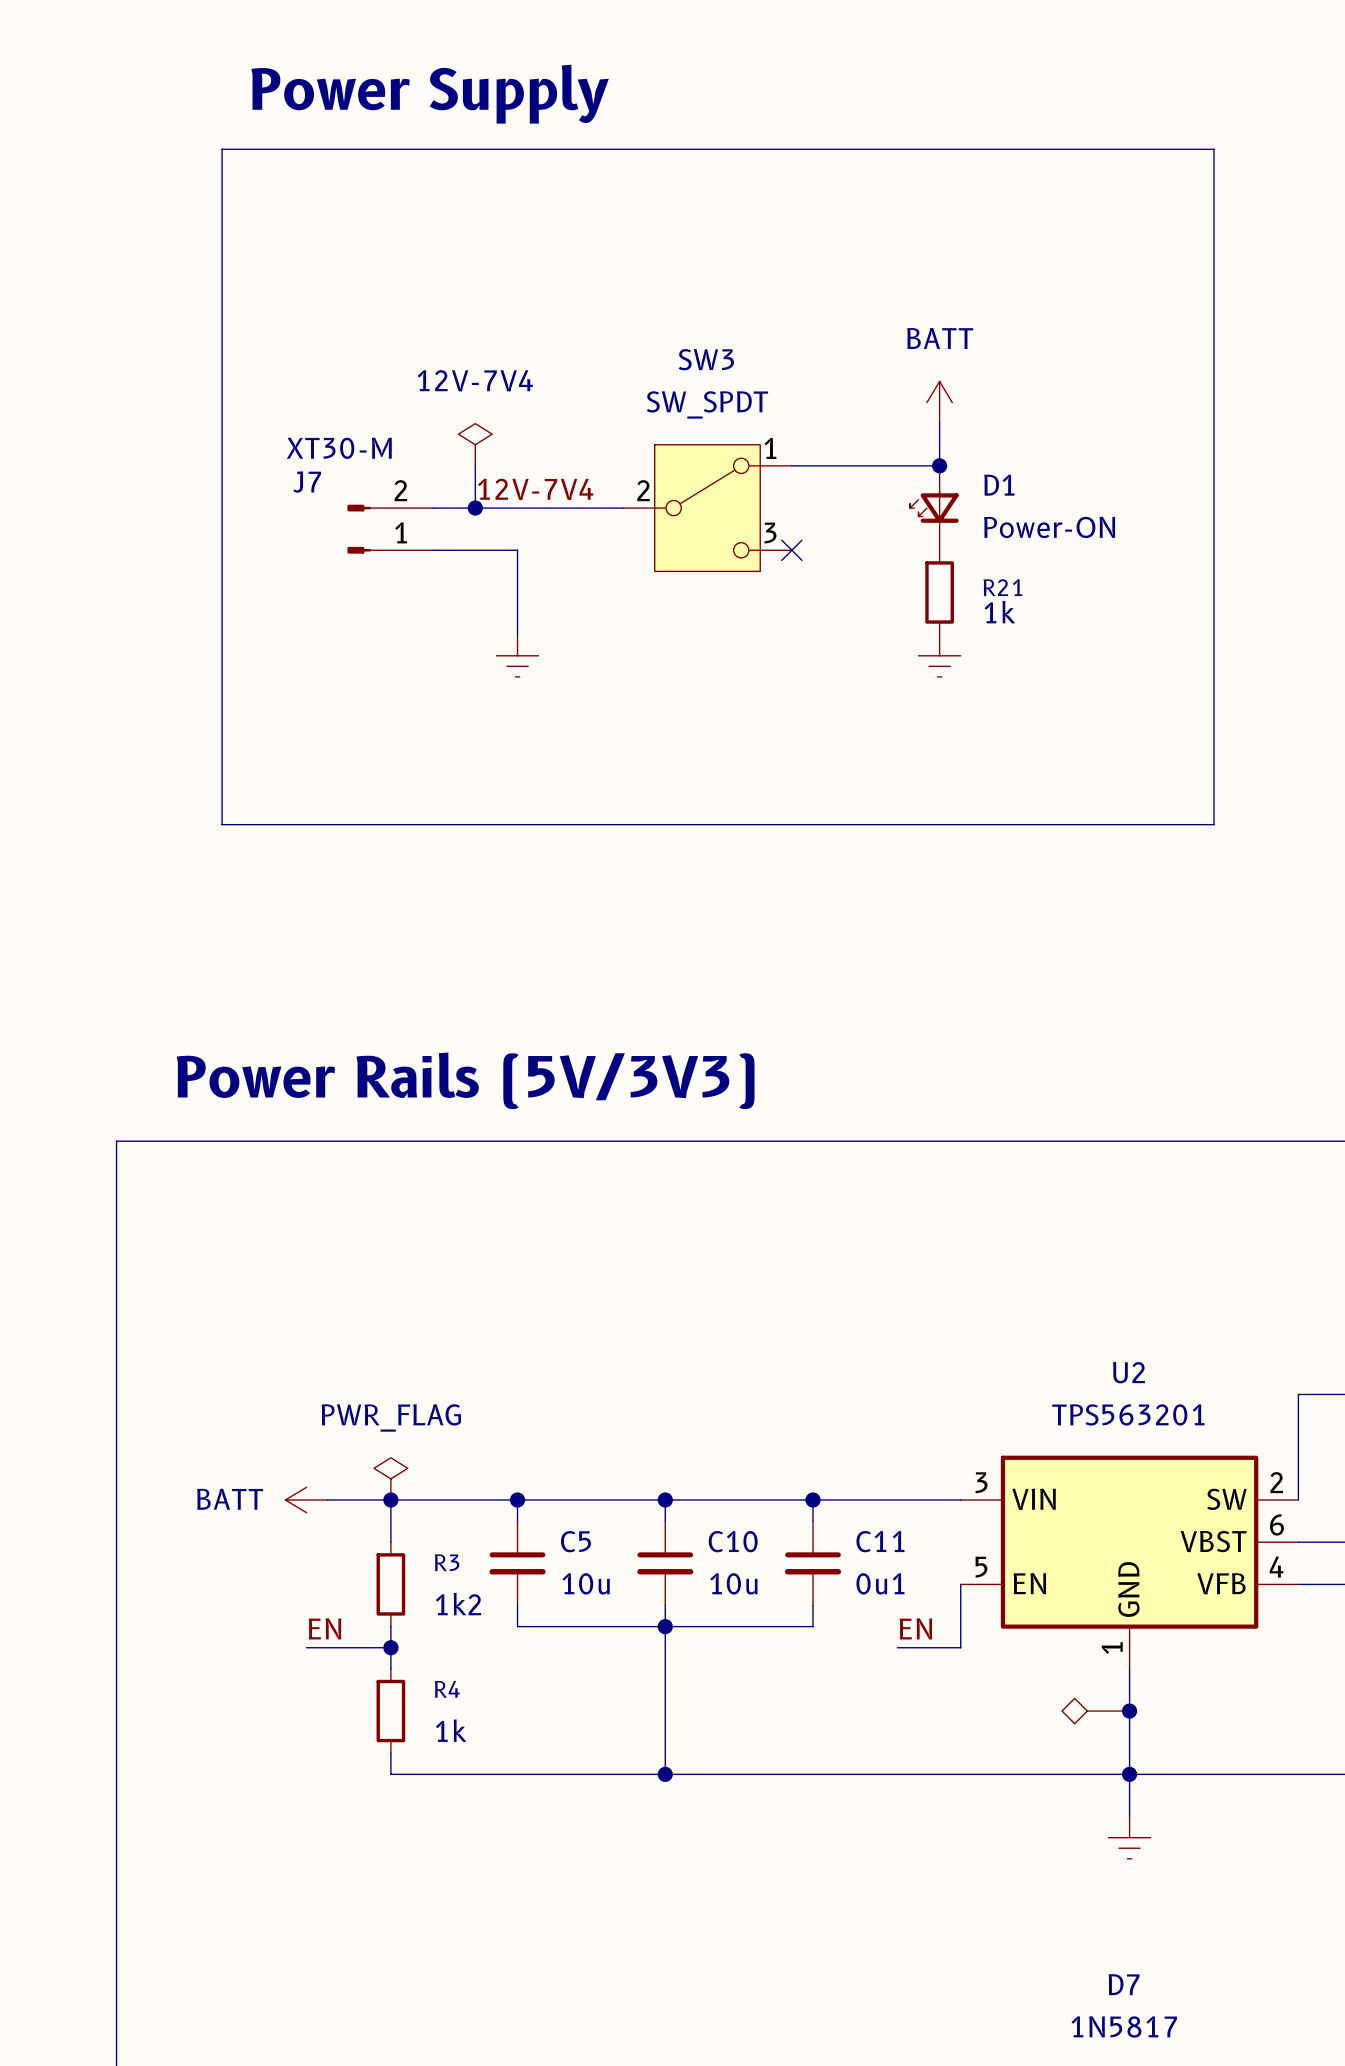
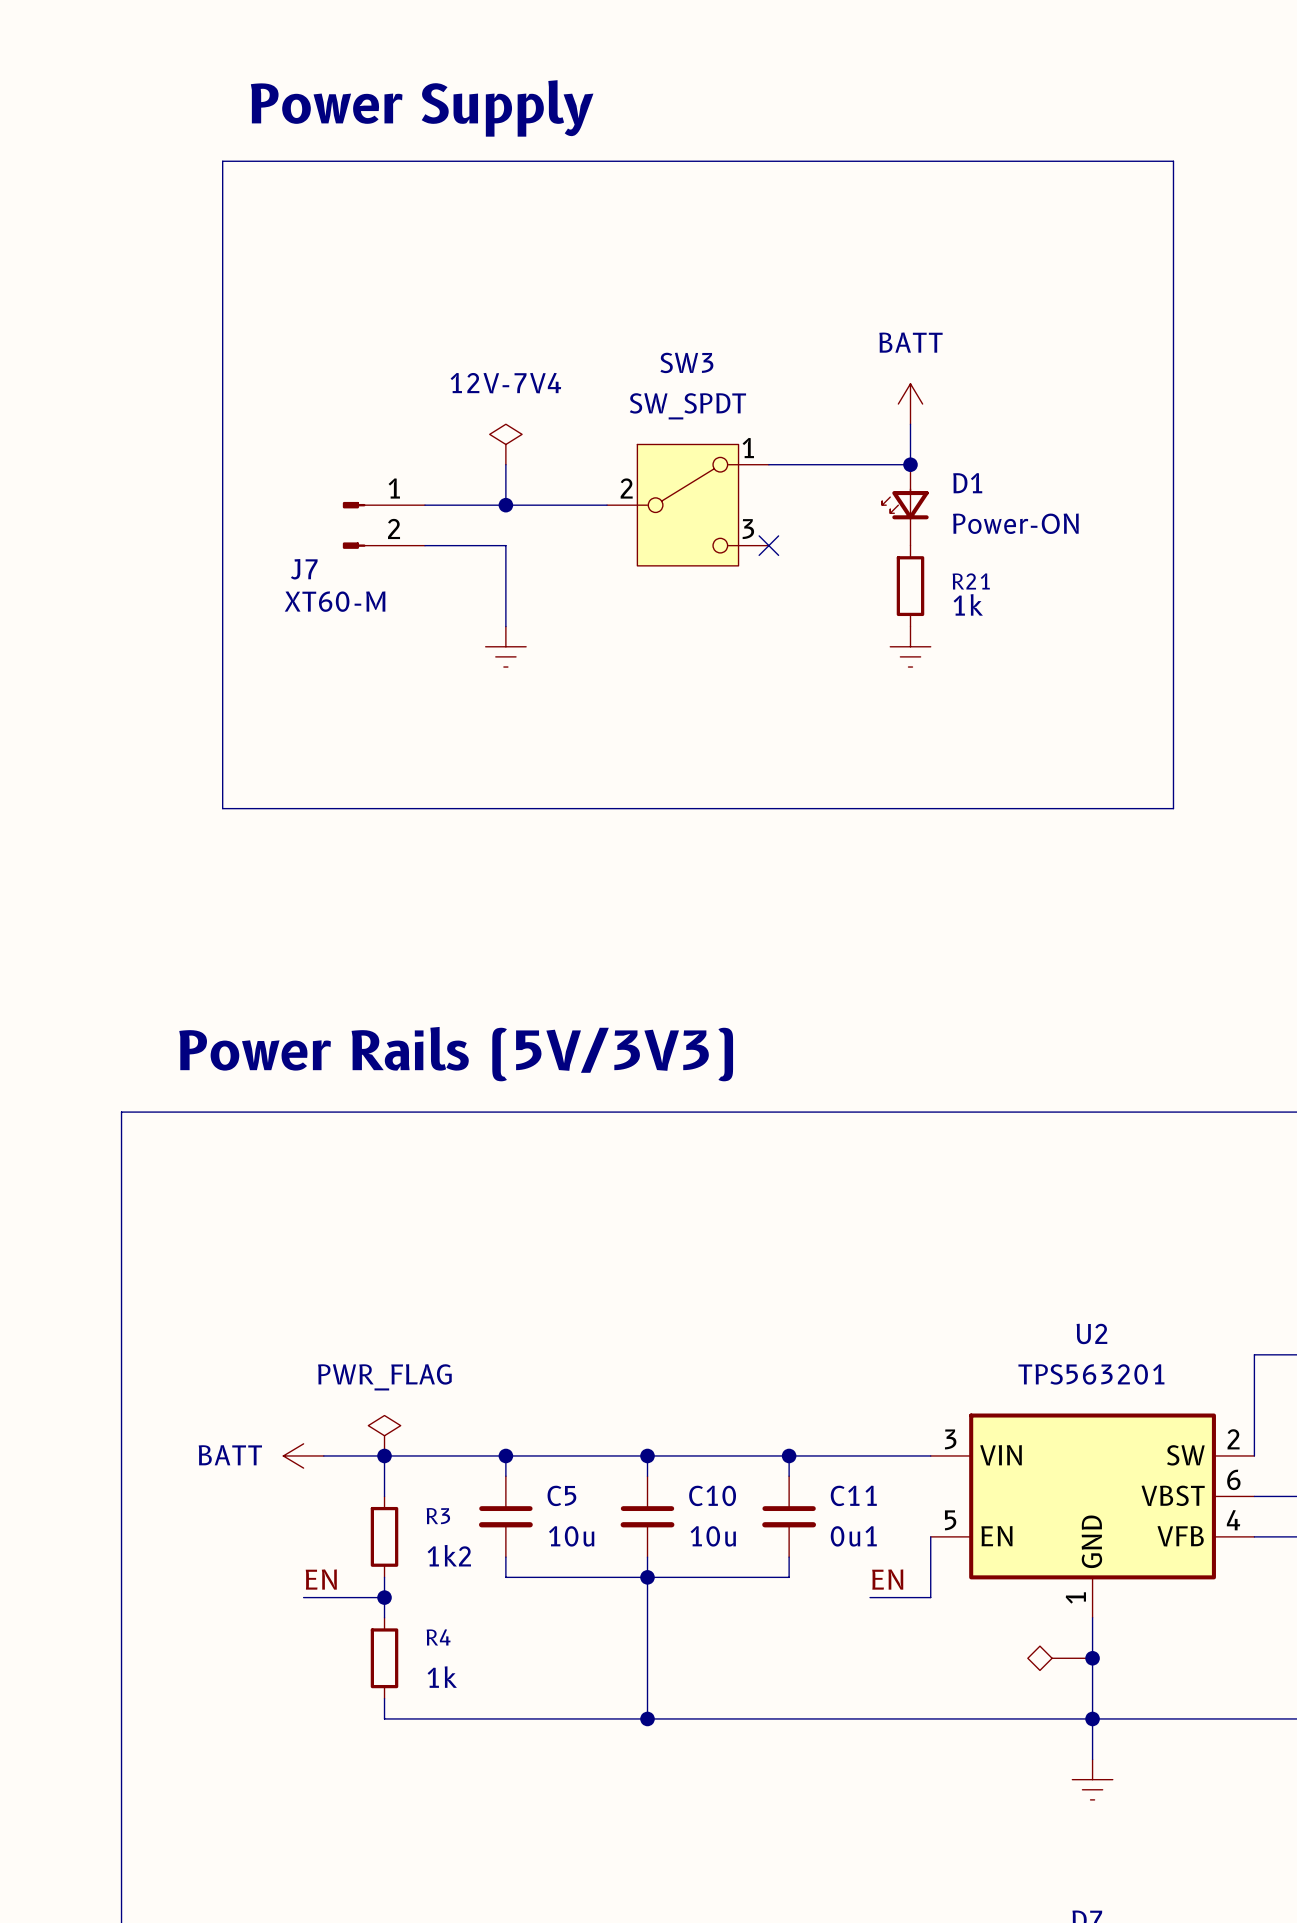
power symbol position: 12V-7V4 (475, 444) -> 12V-7V4 (505, 444)
J7 value: XT30-M (339, 448) -> XT60-M (335, 601)
wire: (475, 465) (475, 508) -> (505, 464) (505, 505)
label: 12V-7V4 (535, 489) -> none
junction position: (475, 508) -> (505, 505)
J7 flip: as is (359, 529) -> up-down (354, 525)

